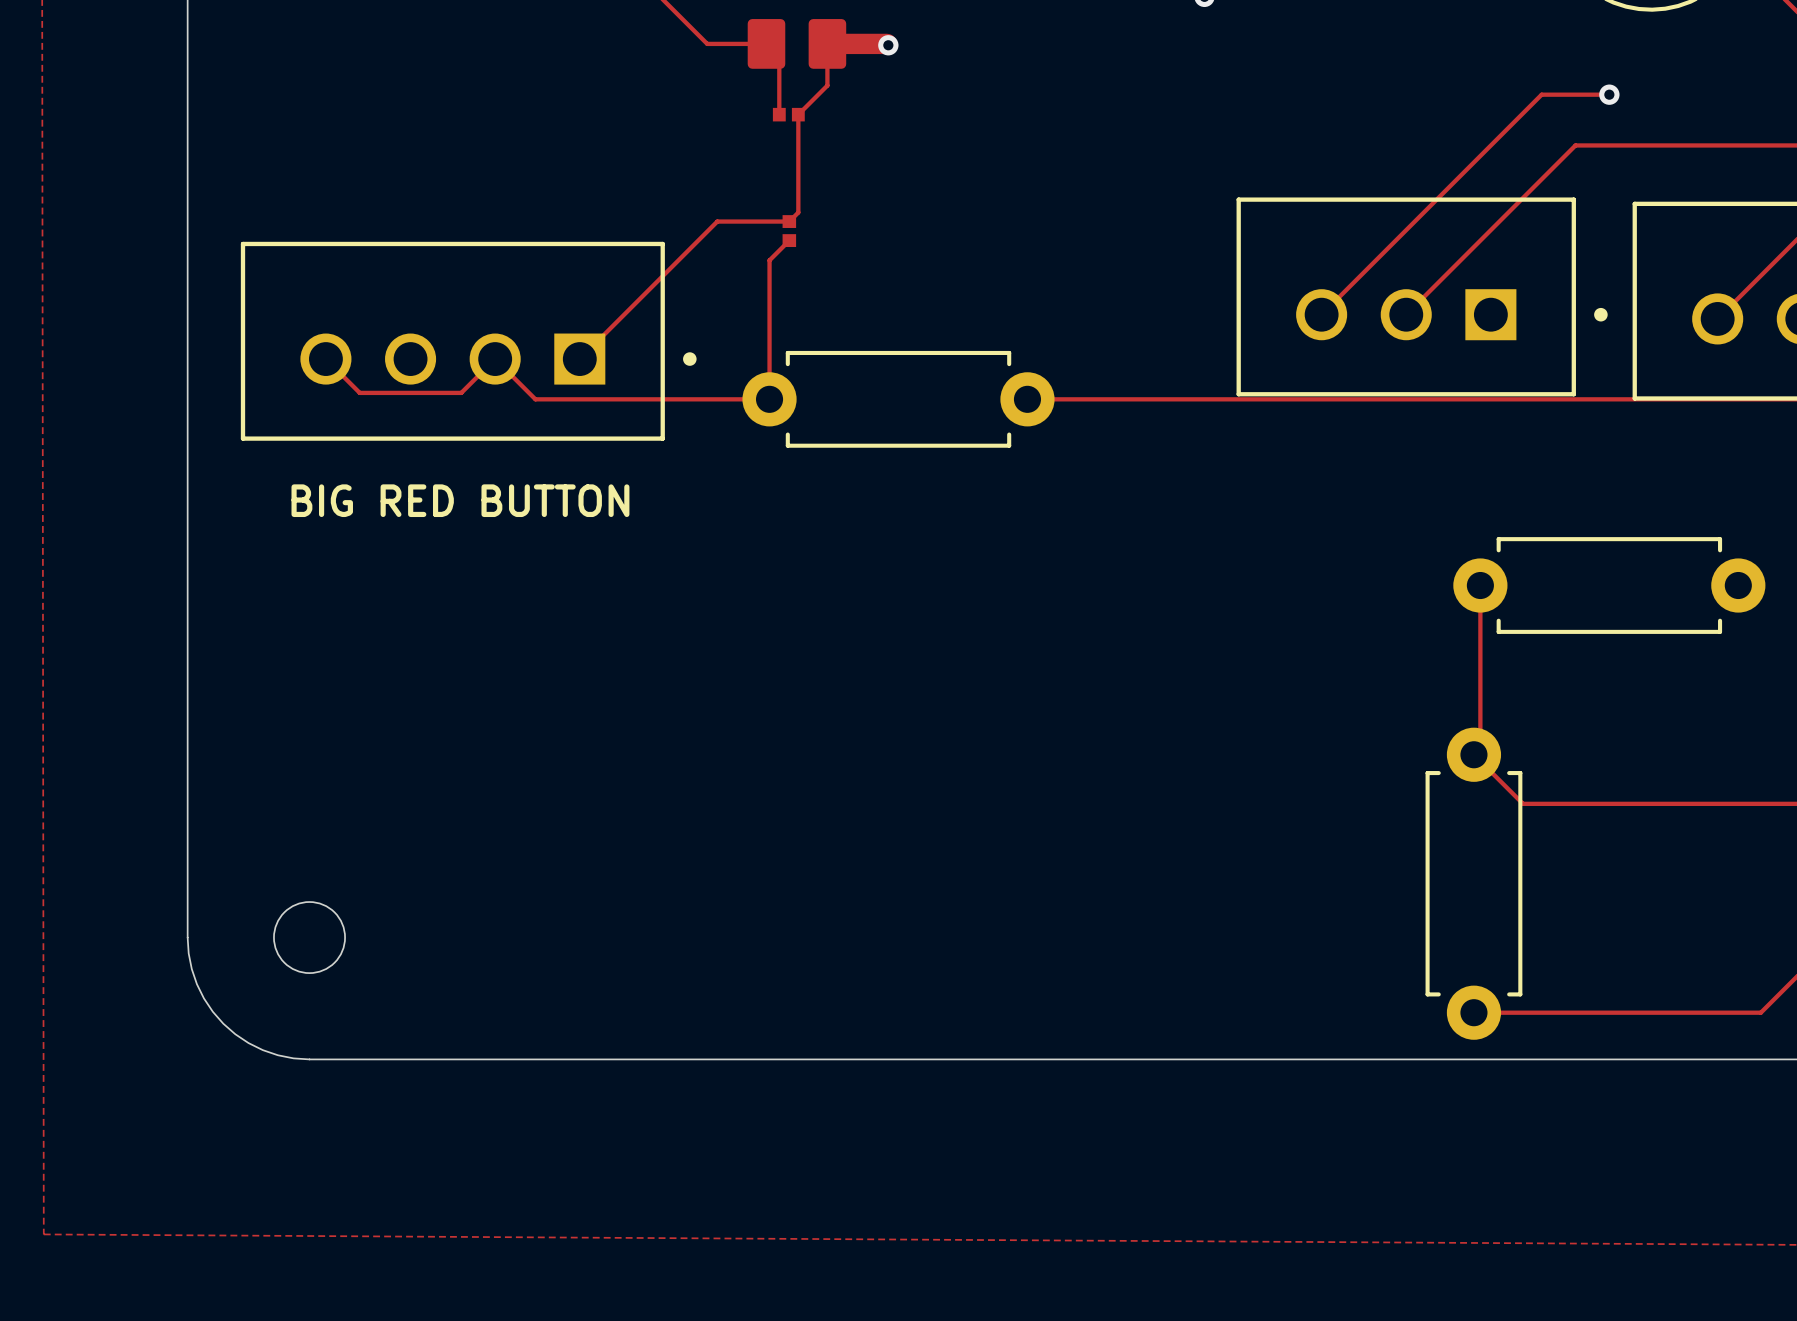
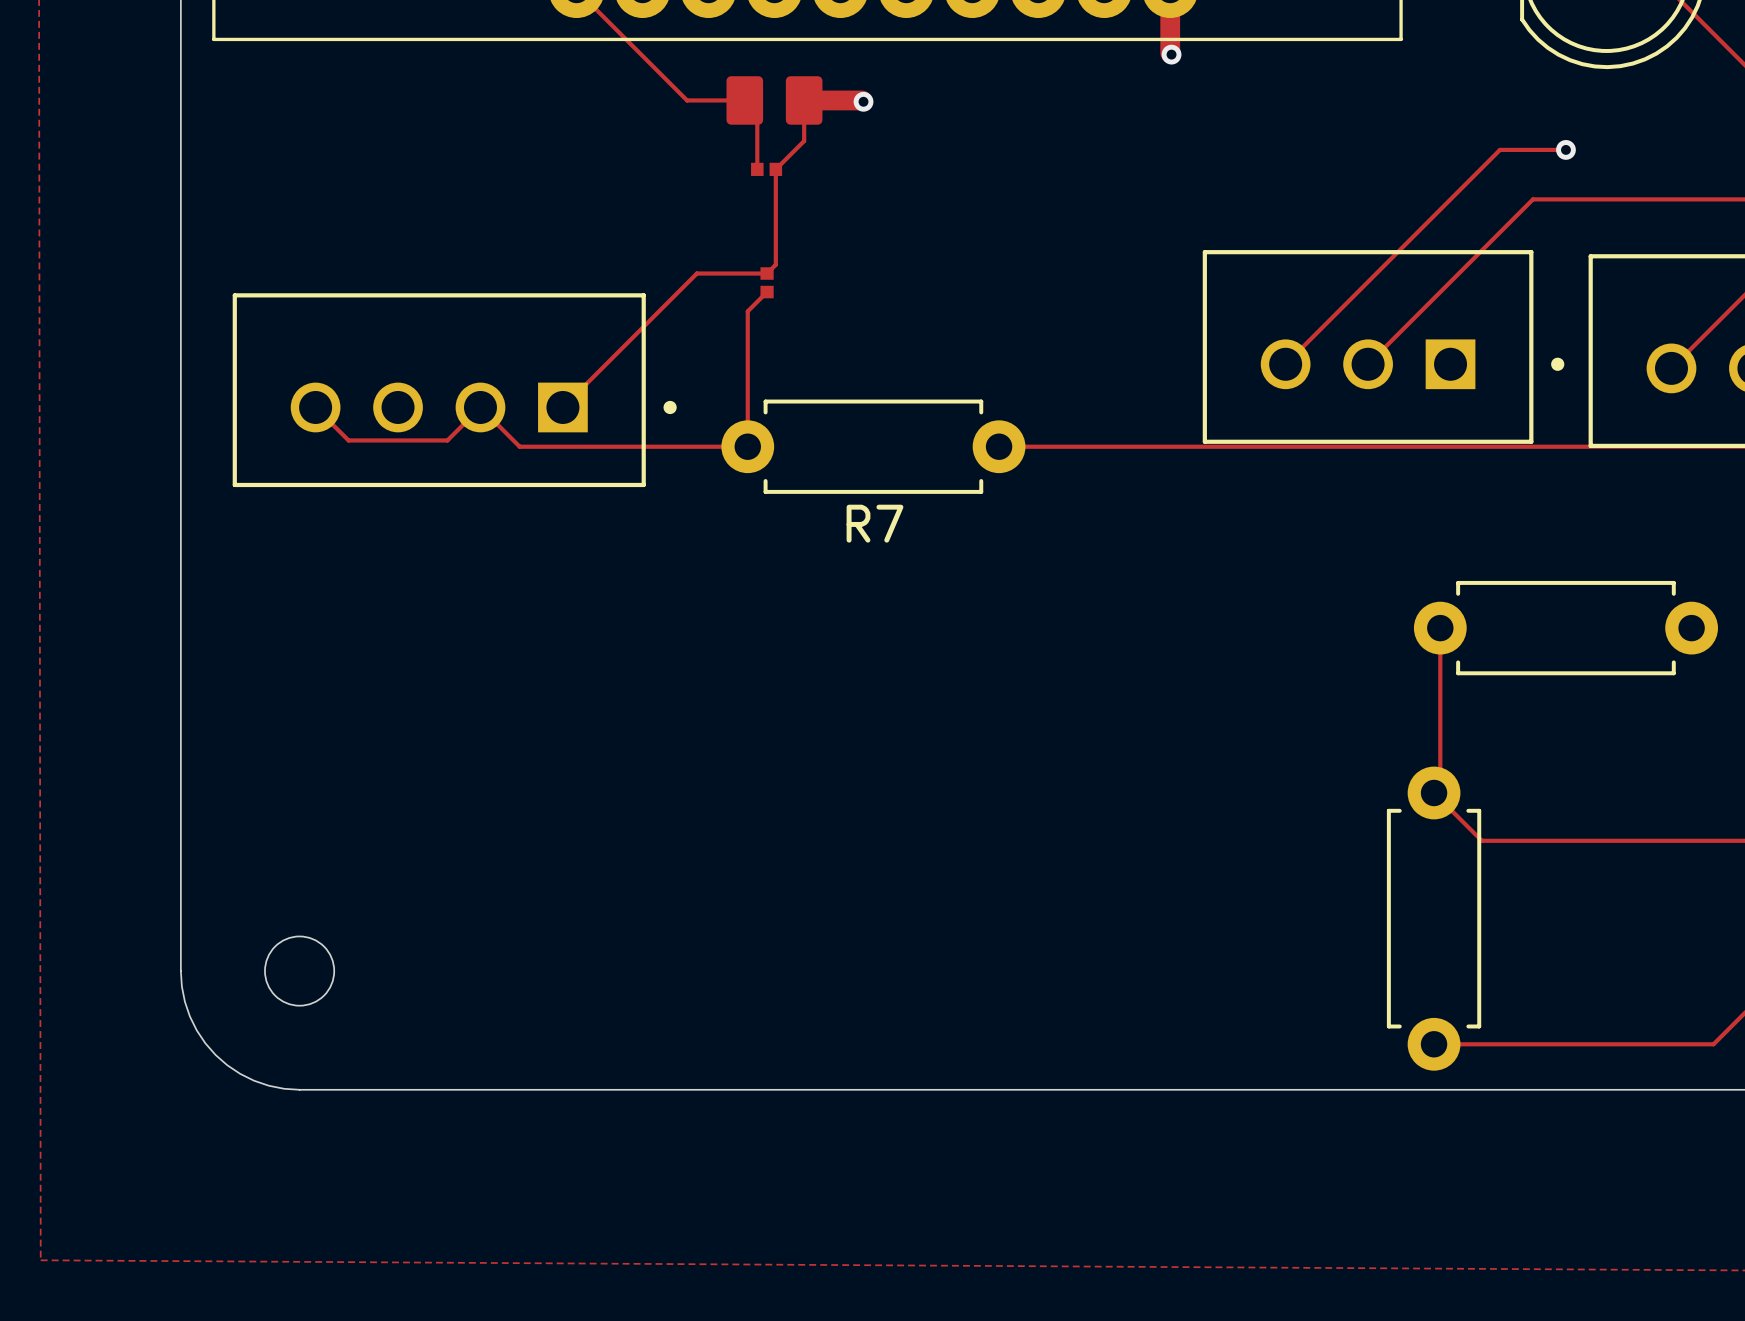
R7 name: none -> R7 (874, 523)
text: BIG RED BUTTON (460, 500) -> none

